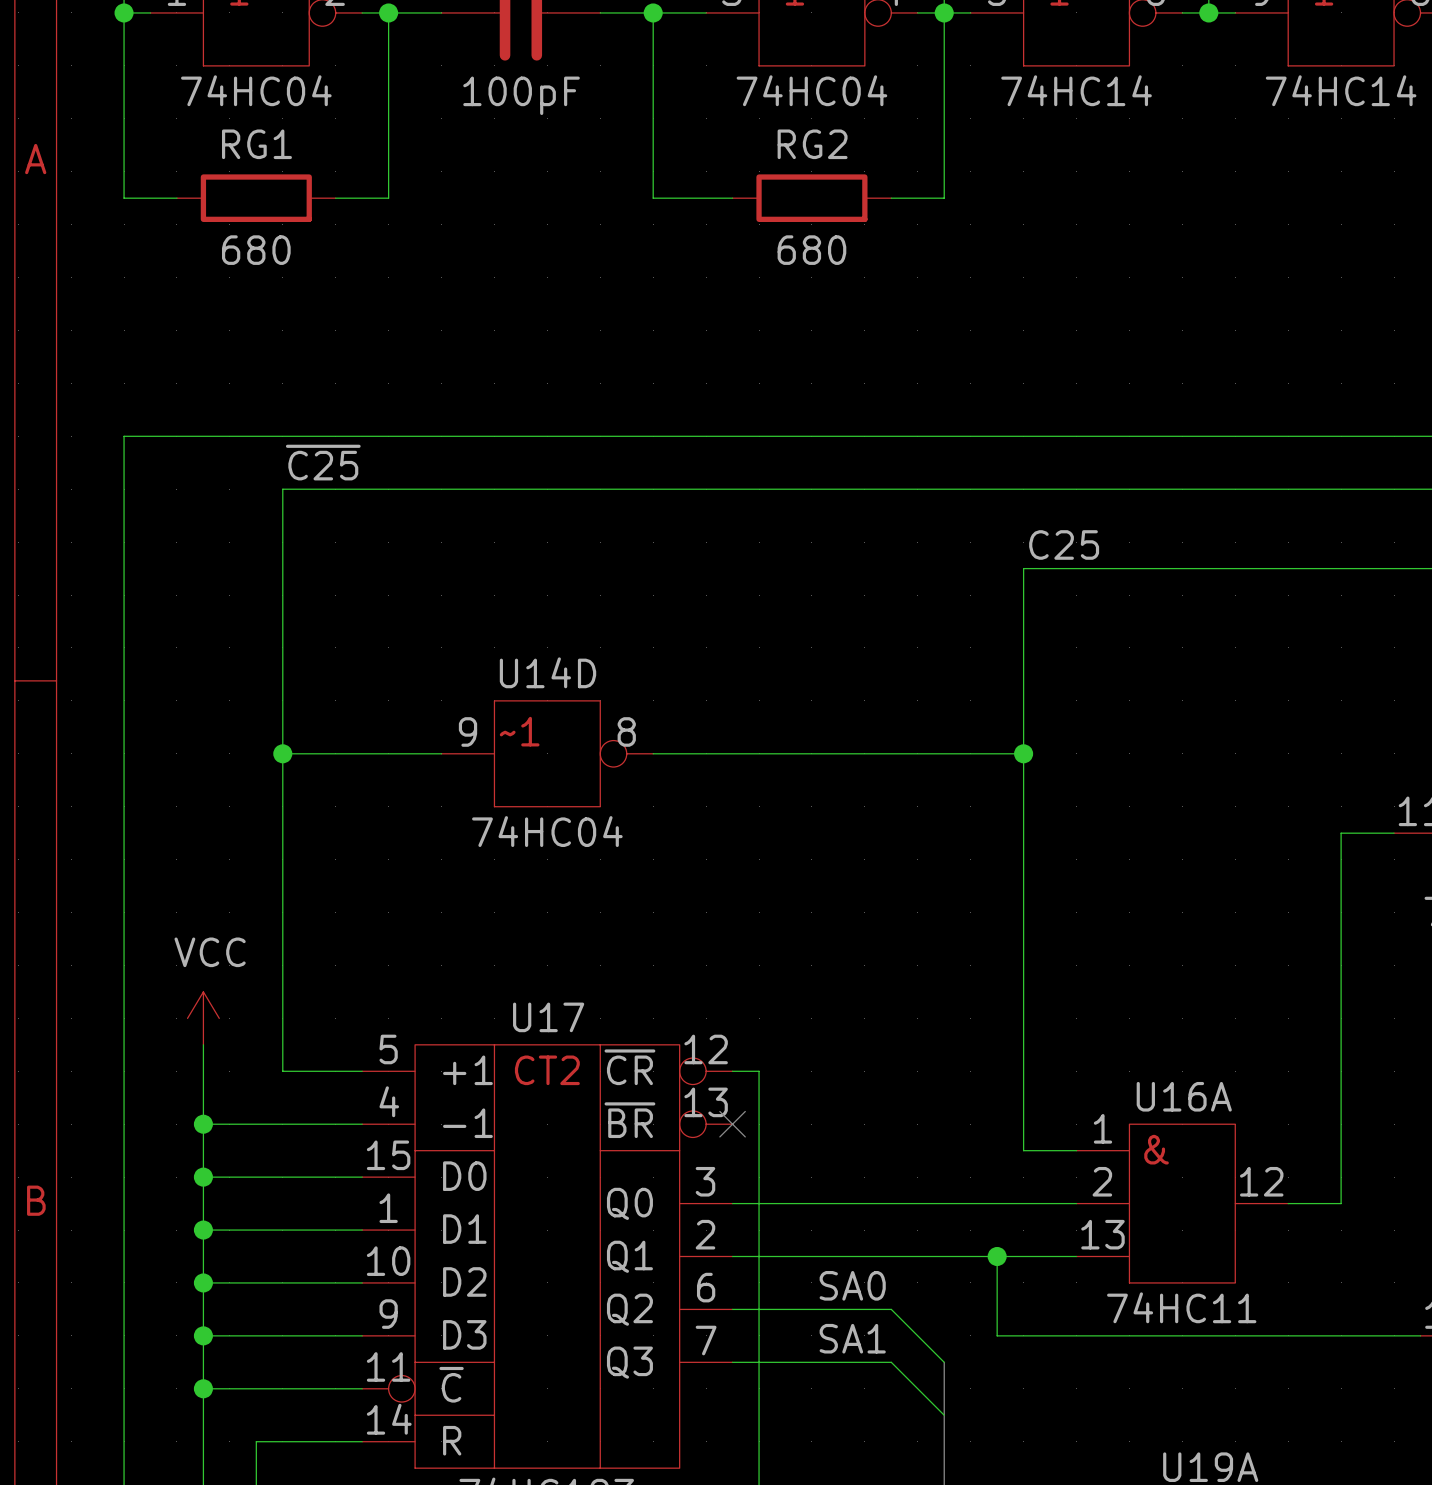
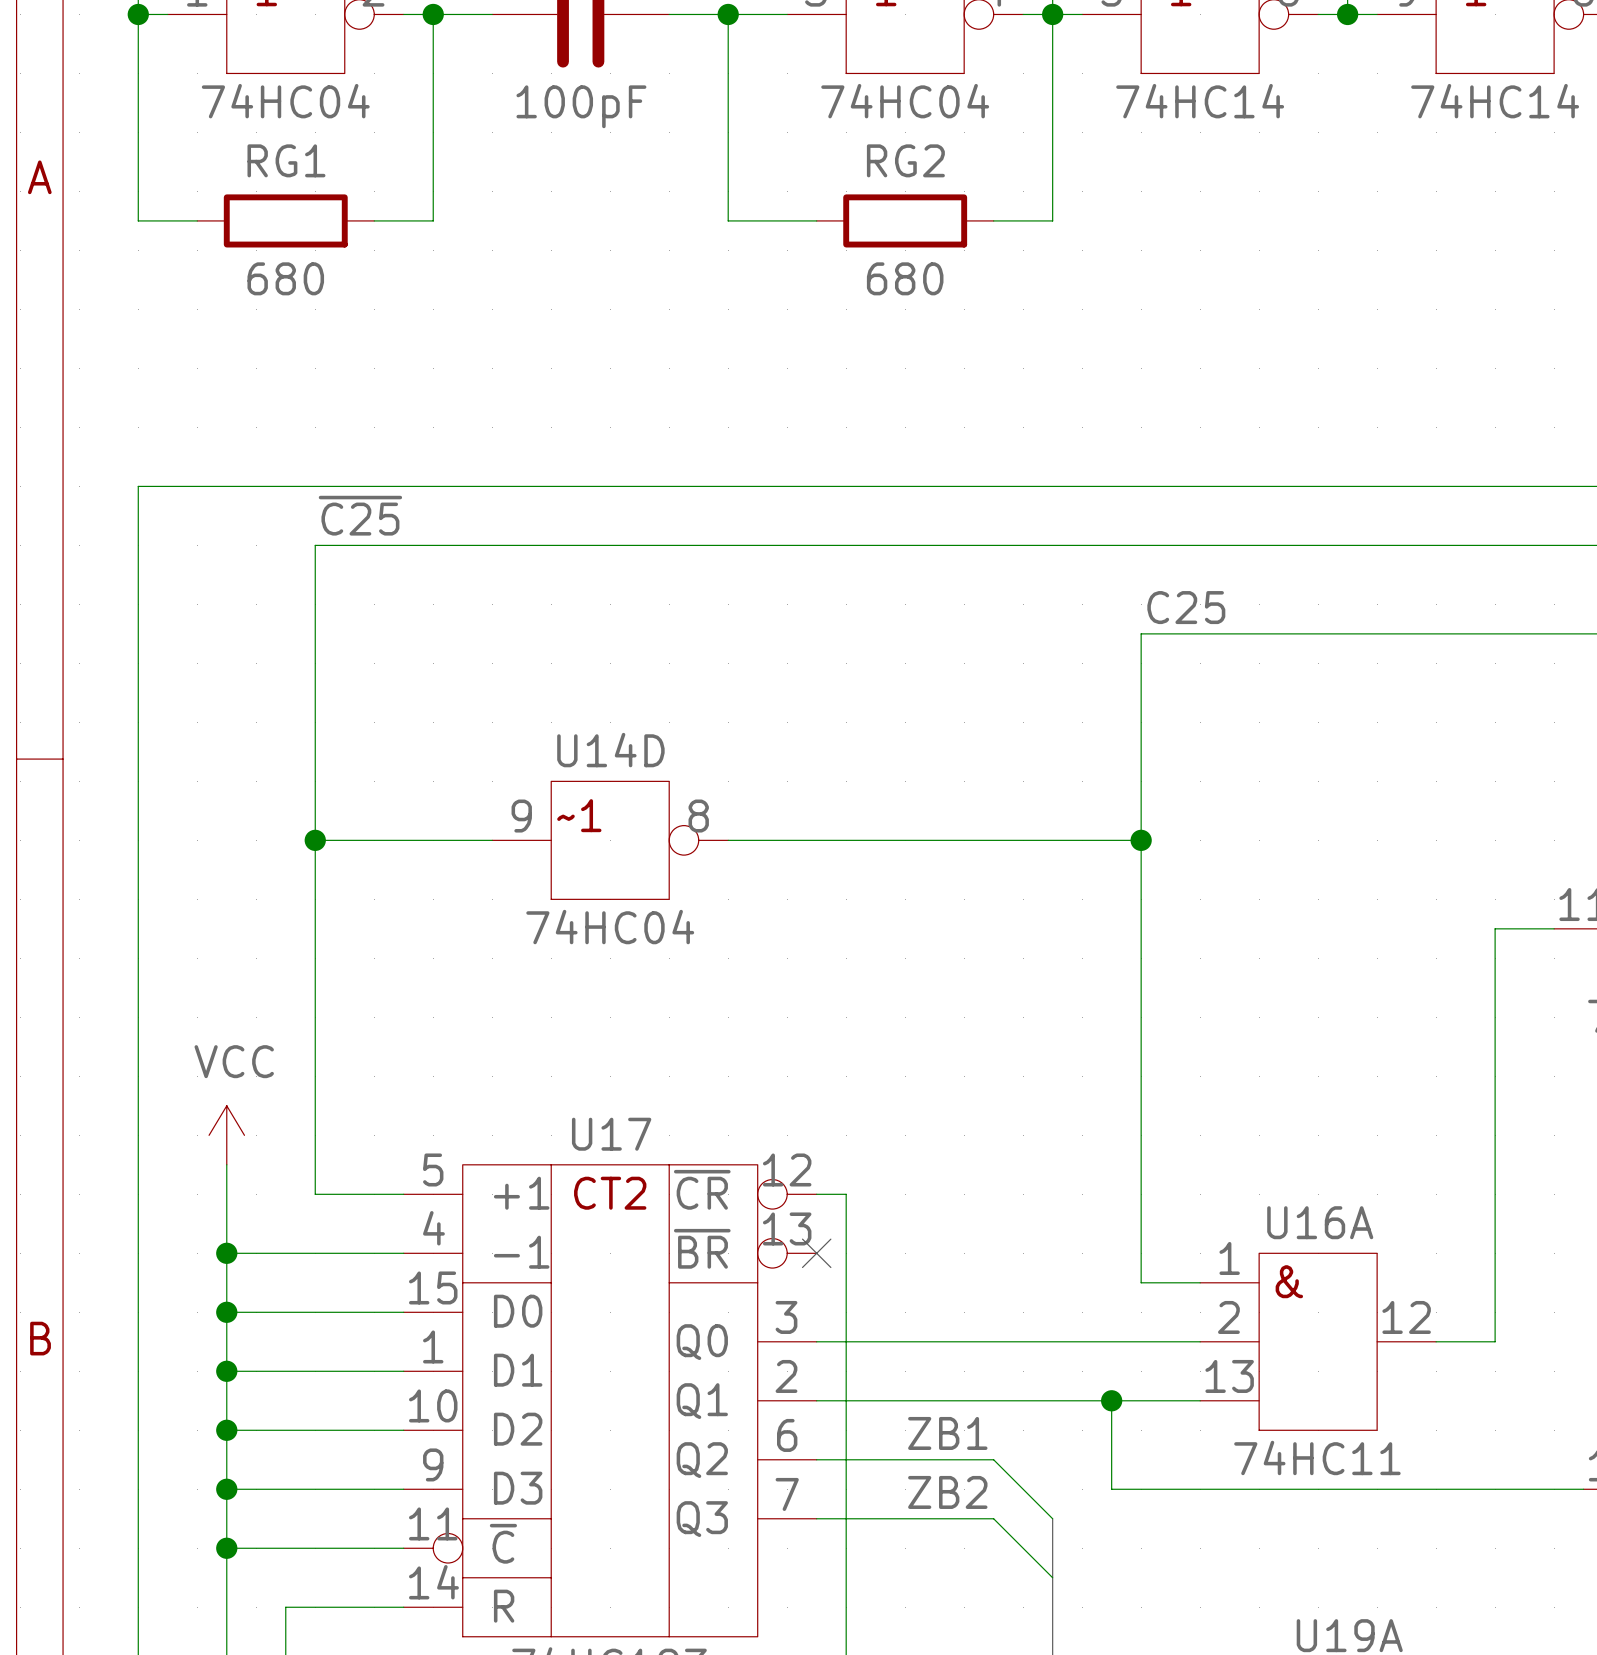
label: SA0 (852, 1285) -> ZB1 (947, 1433)
label: SA1 (852, 1338) -> ZB2 (947, 1492)

